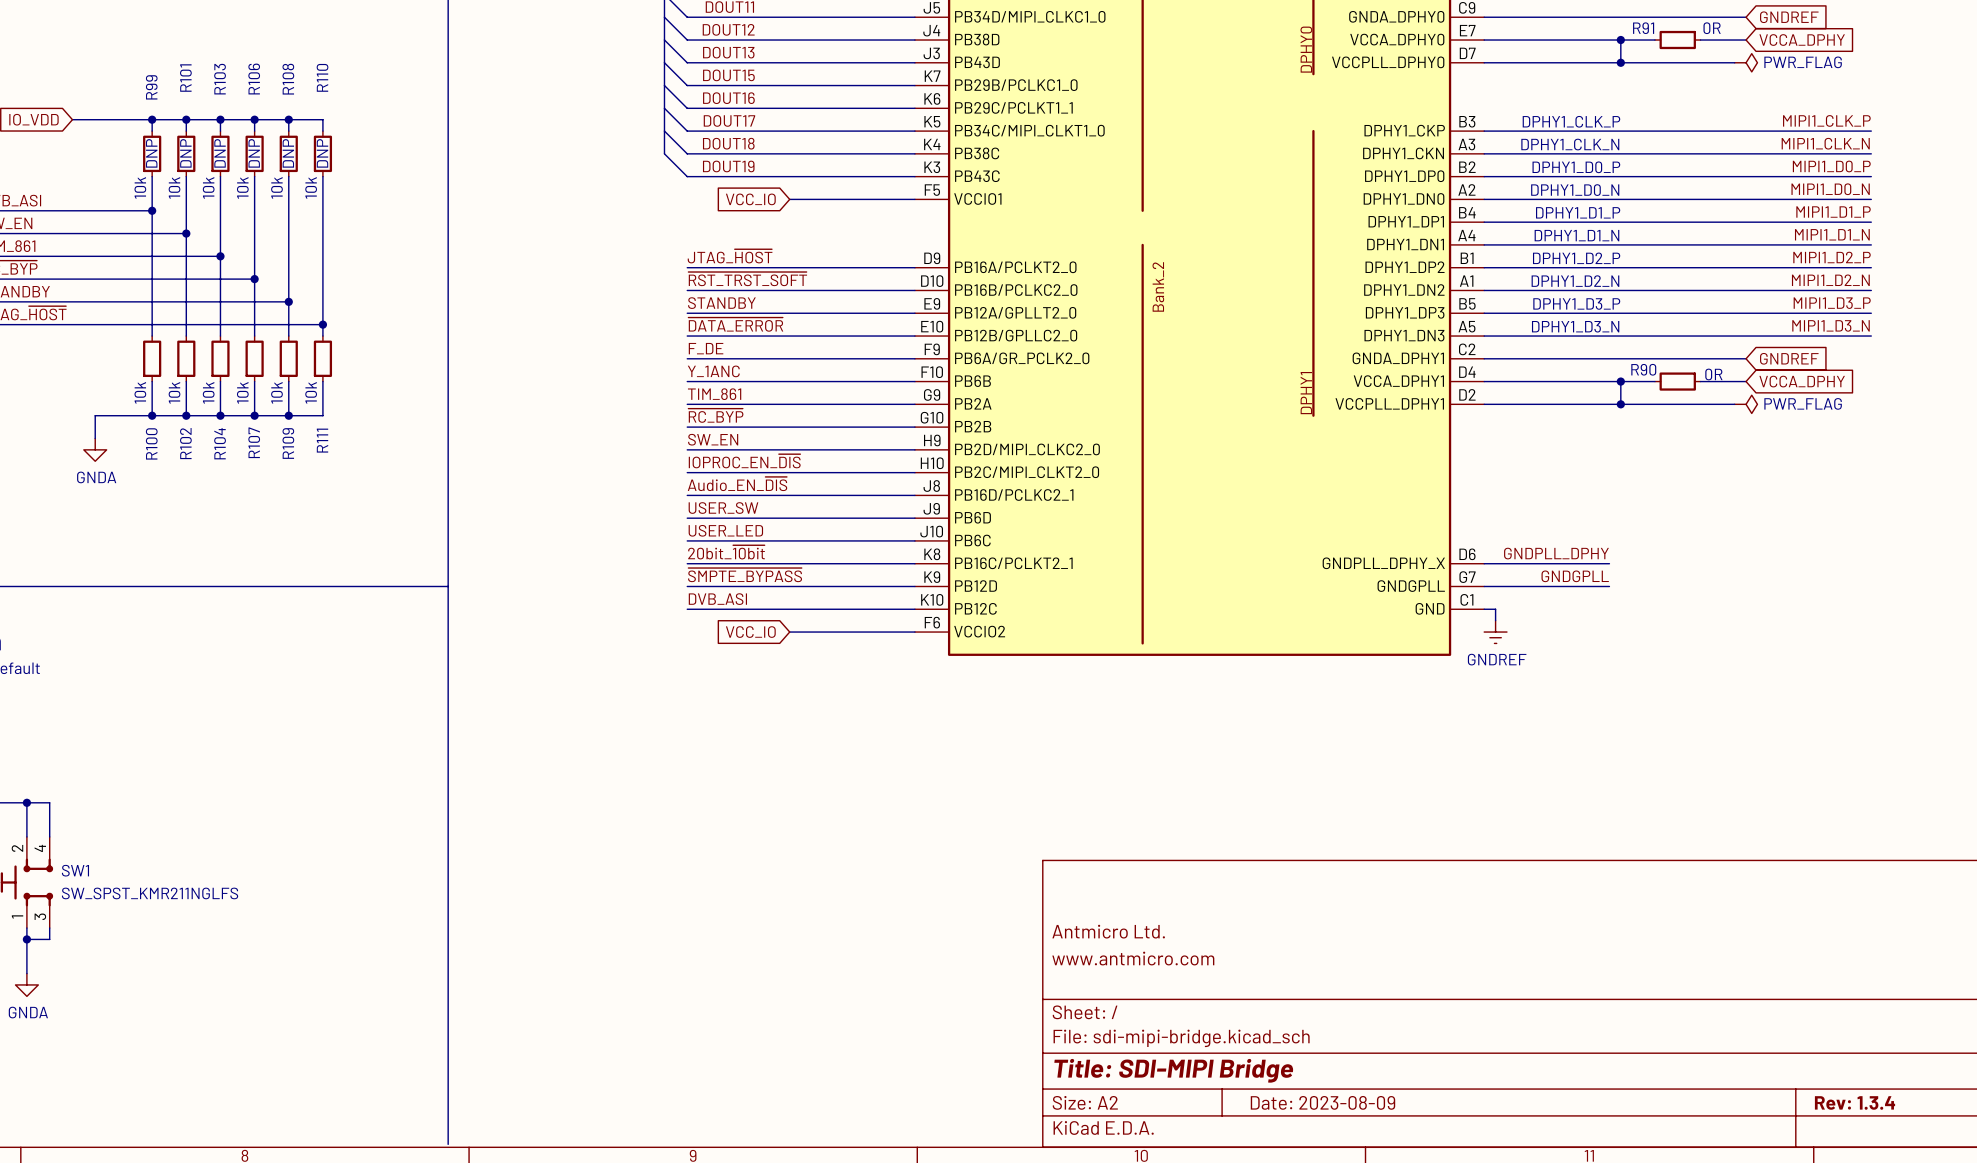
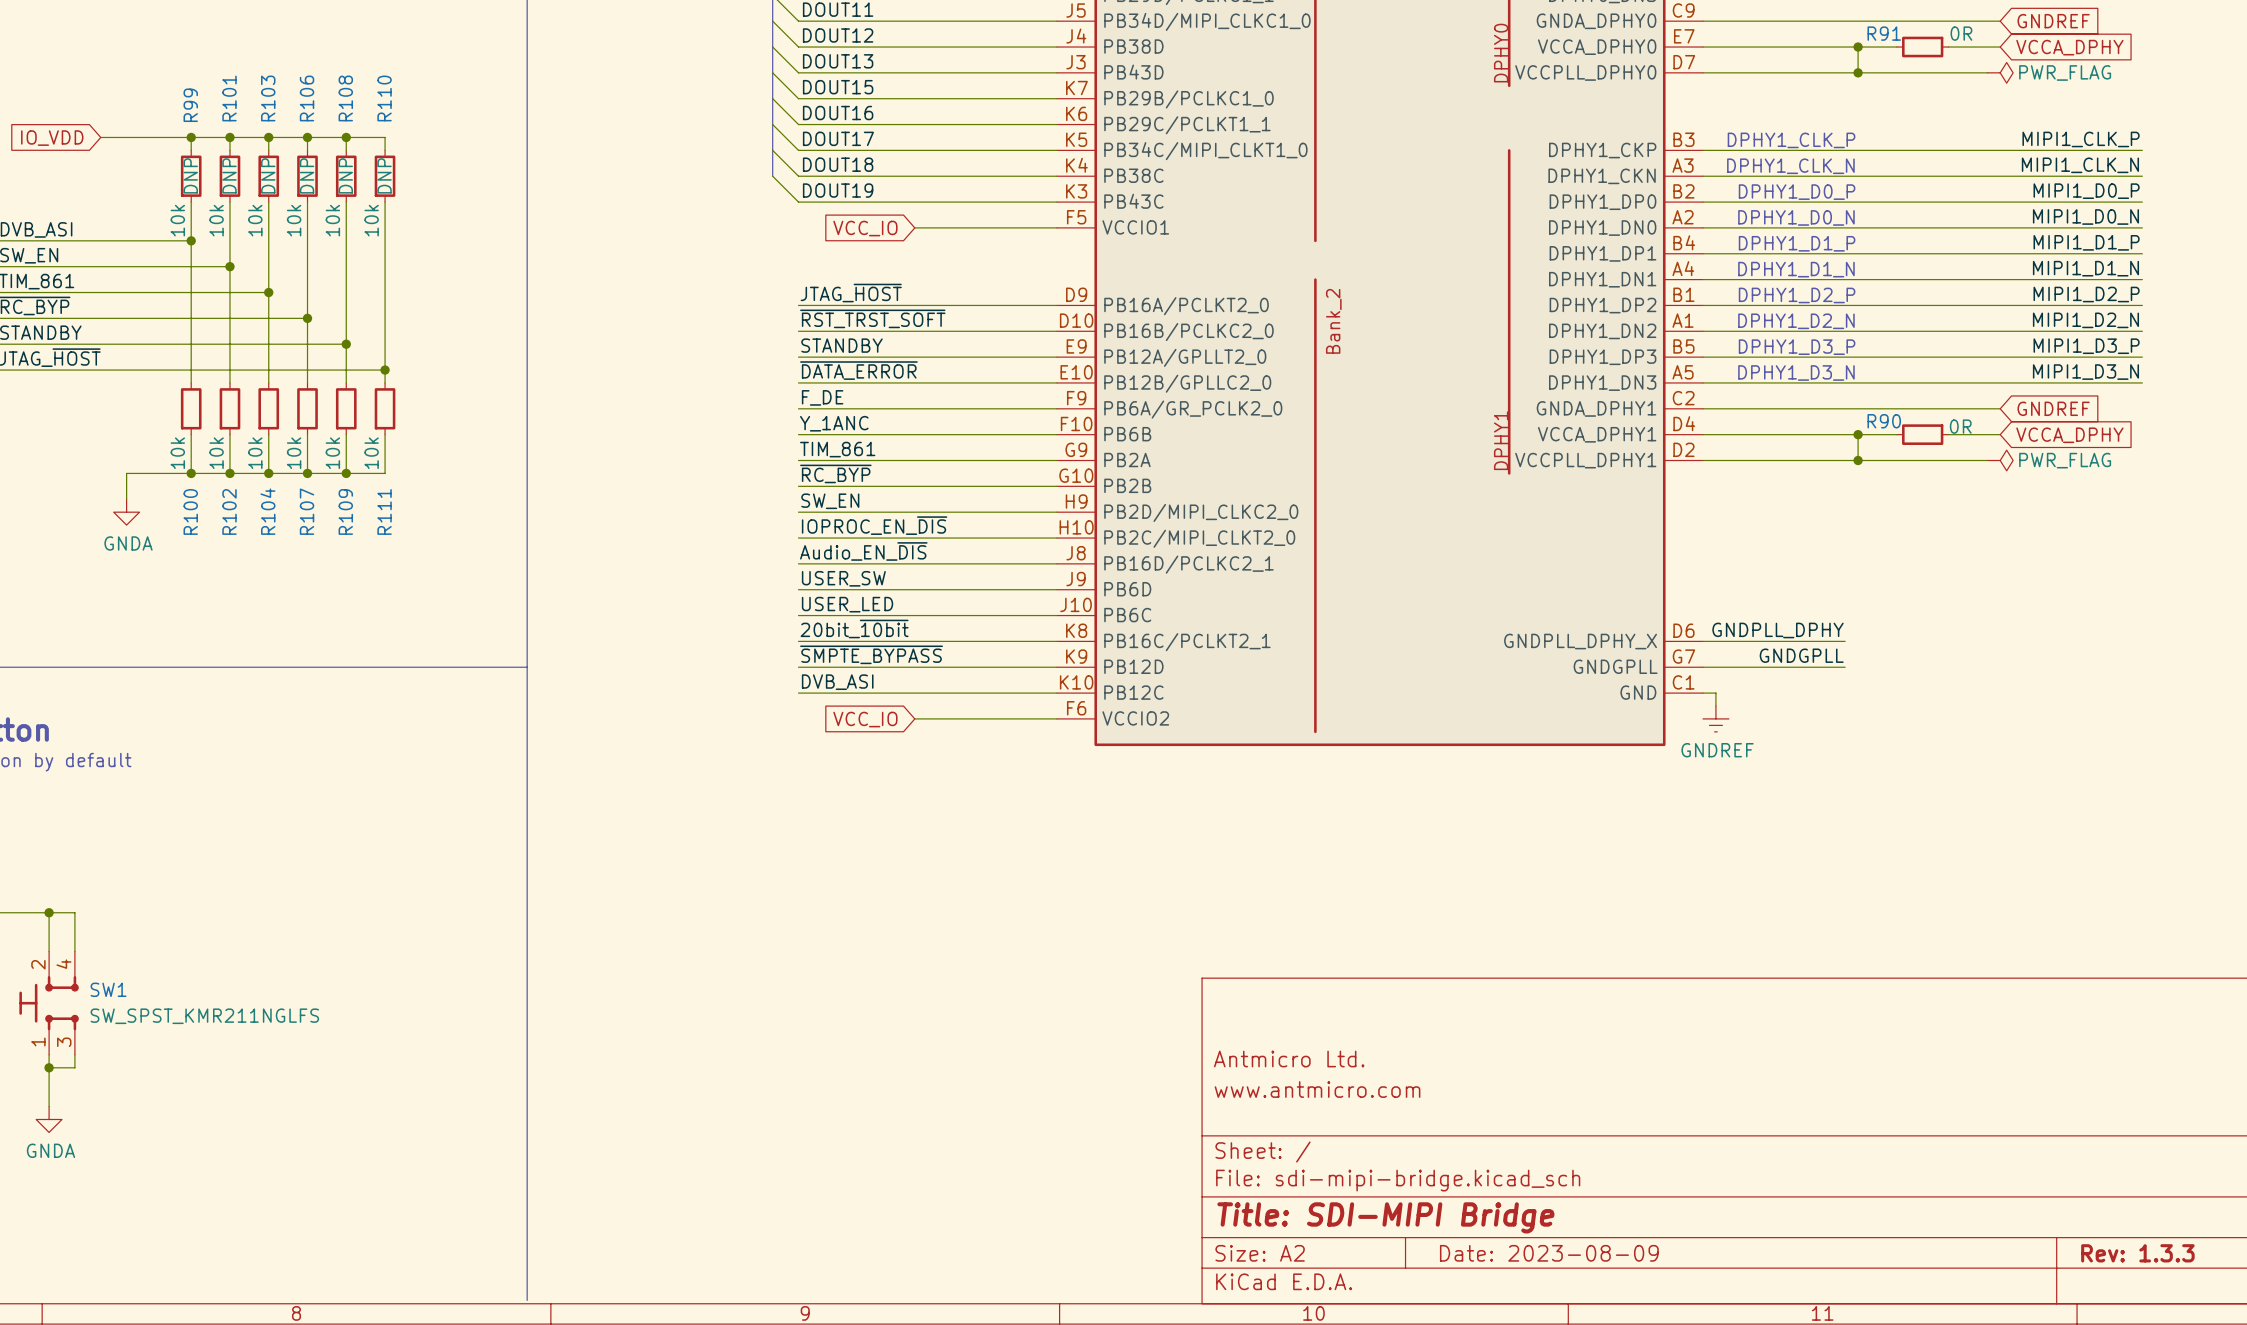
title block: Rev: 1.3.4 (1855, 1102) -> Rev: 1.3.3 (2137, 1253)

